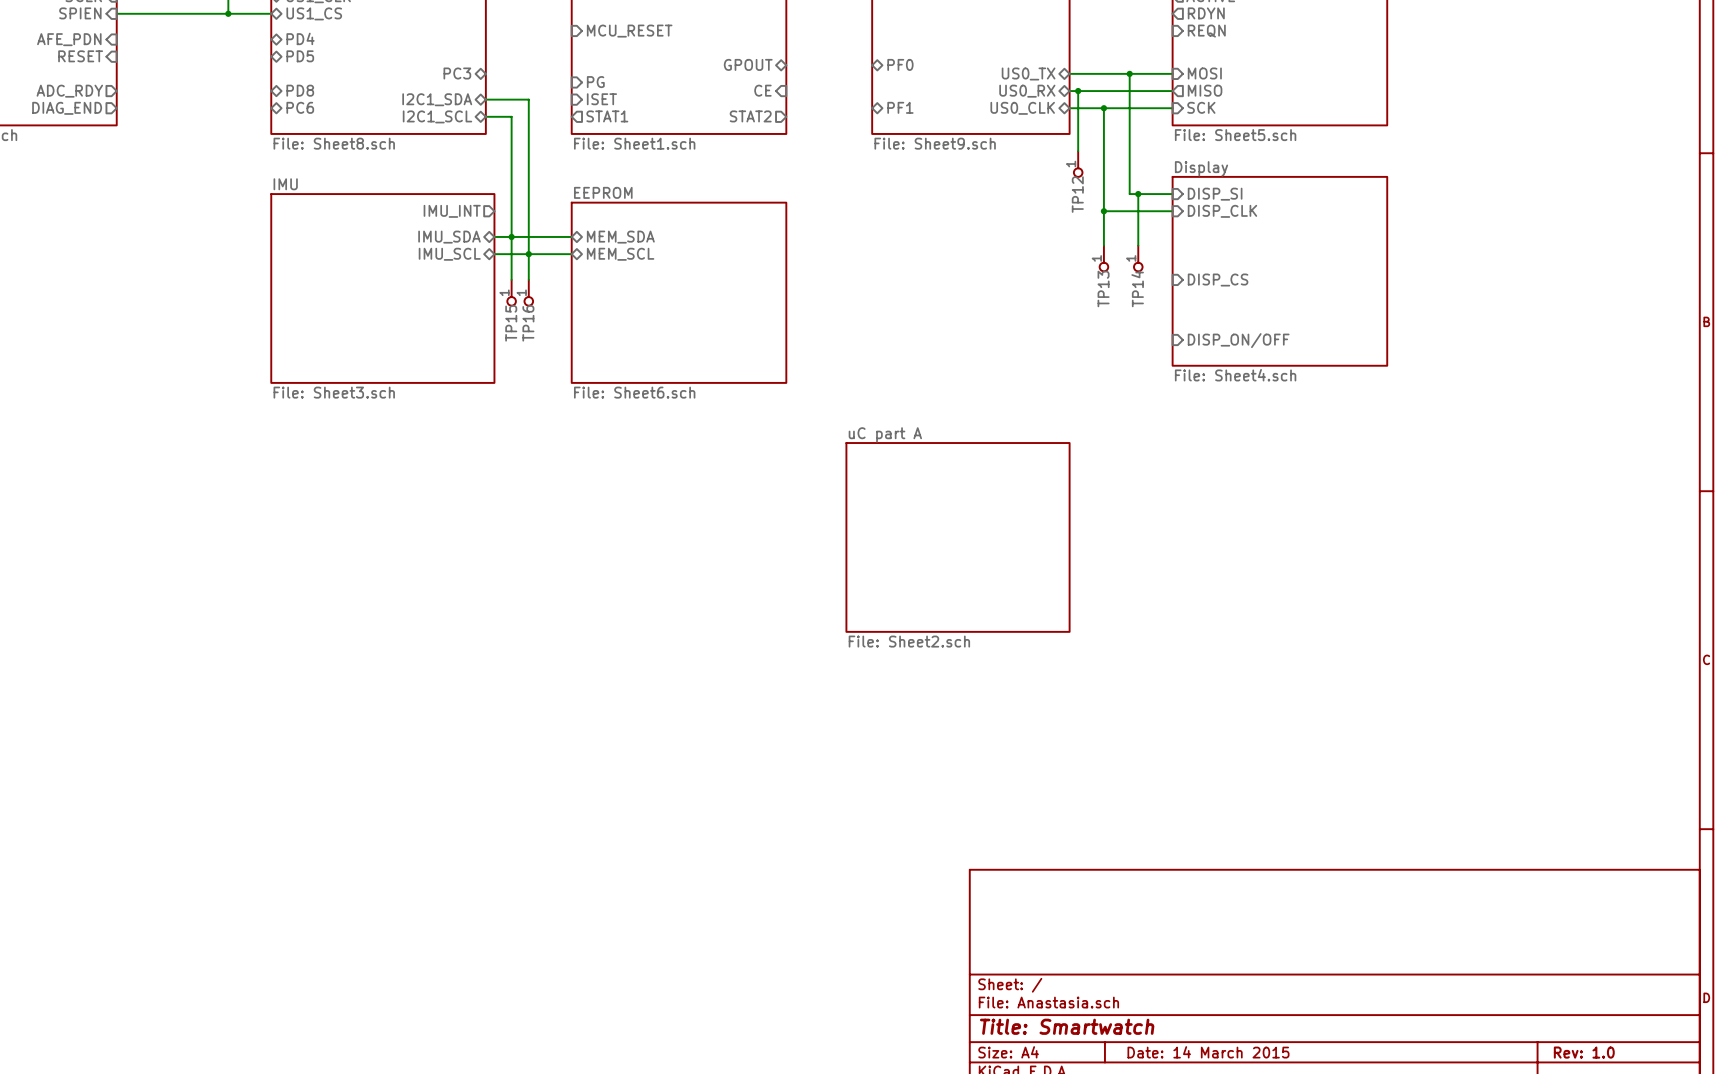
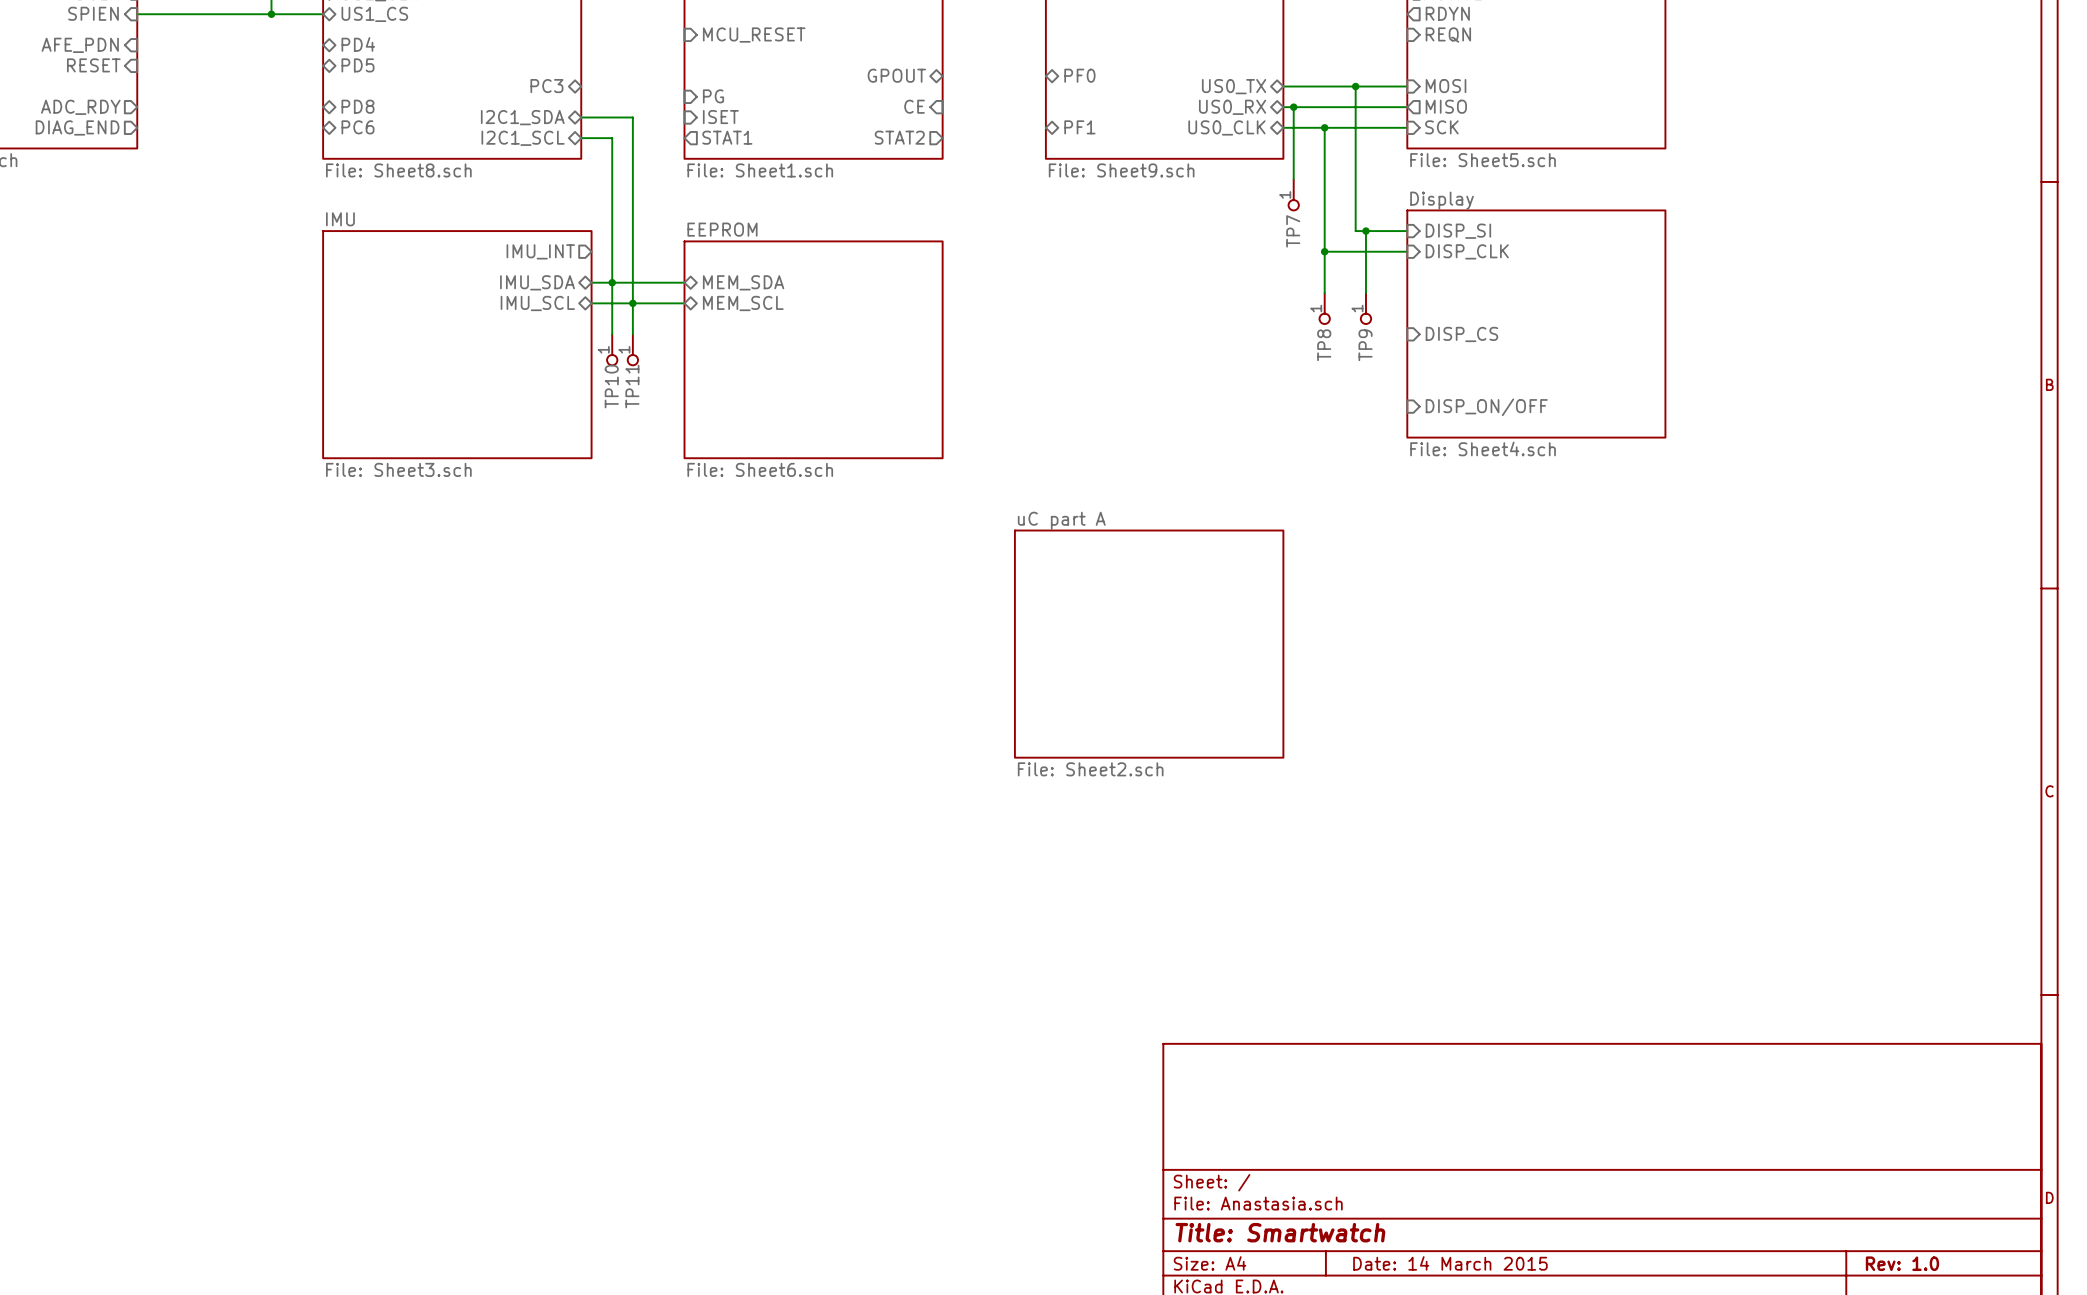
TP12 name: TP12 (1077, 194) -> TP7 (1293, 231)
TP13 name: TP13 (1103, 288) -> TP8 (1324, 345)
TP14 name: TP14 (1137, 288) -> TP9 (1365, 345)
TP15 name: TP15 (511, 323) -> TP10 (611, 386)
TP16 name: TP16 (528, 323) -> TP11 (632, 386)

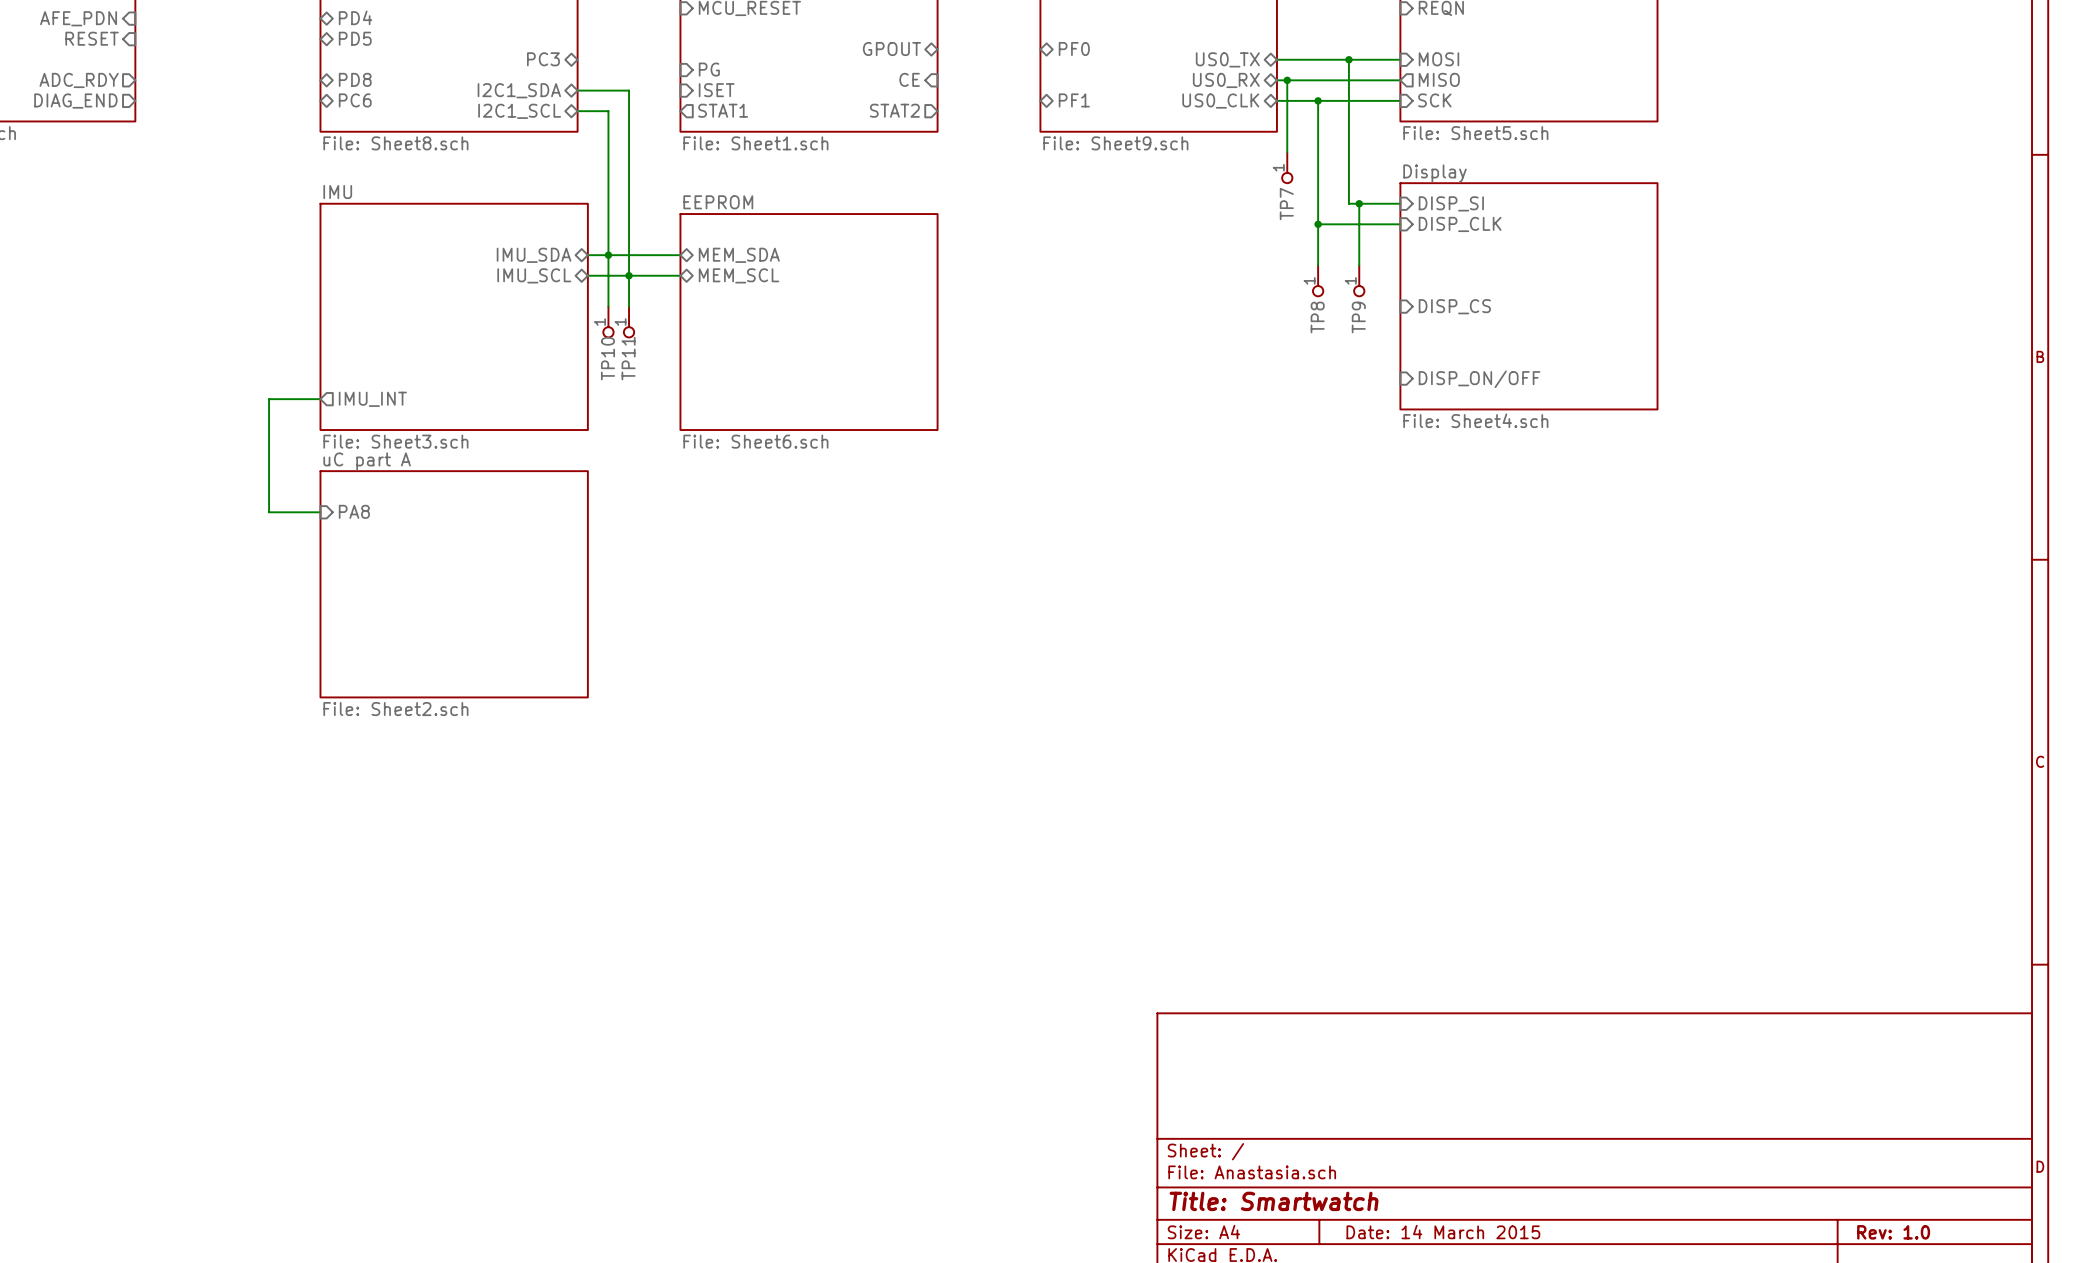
sheet pin: IMU_INT (540, 251) -> none
wire: none -> (320, 399) (269, 399) (269, 512) (320, 512)
sheet pin: none -> IMU_INT (372, 399)
sheet pin: none -> PA8 (354, 511)
sheet uC part A: none -> File: Sheet2.sch (454, 584)
sheet uC part A: File: Sheet2.sch (1149, 644) -> none

